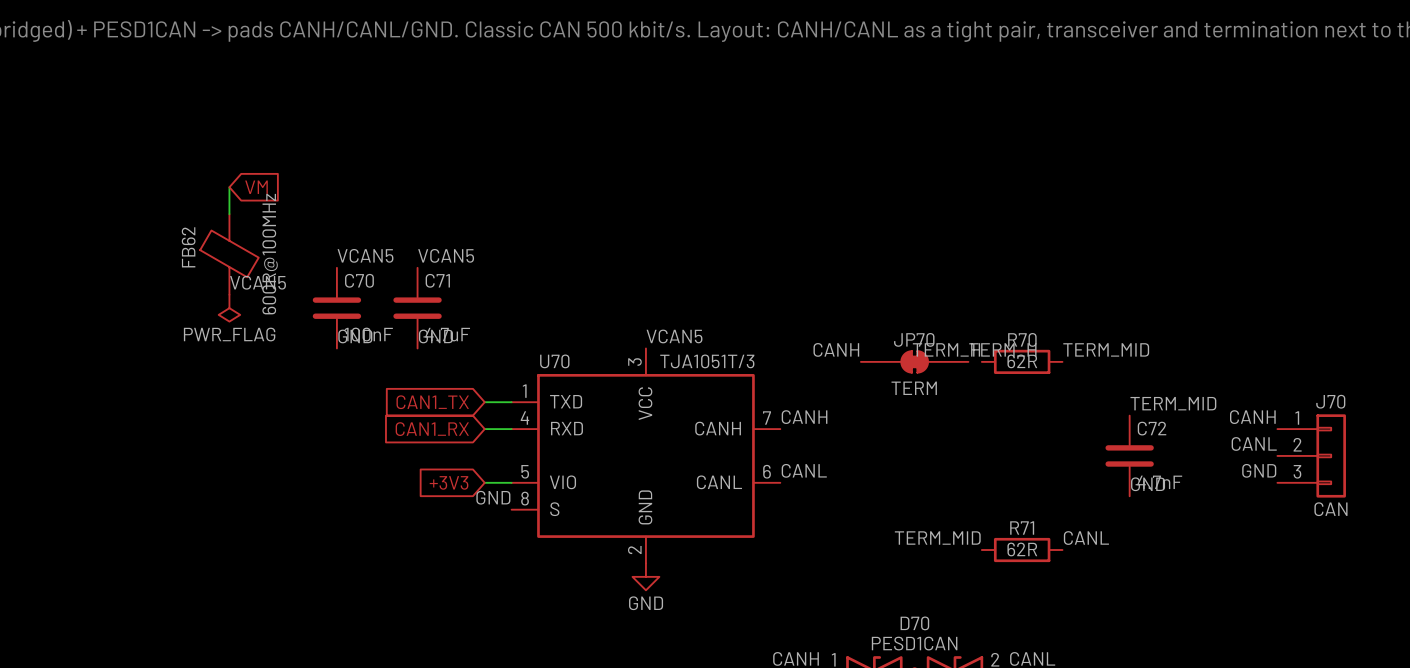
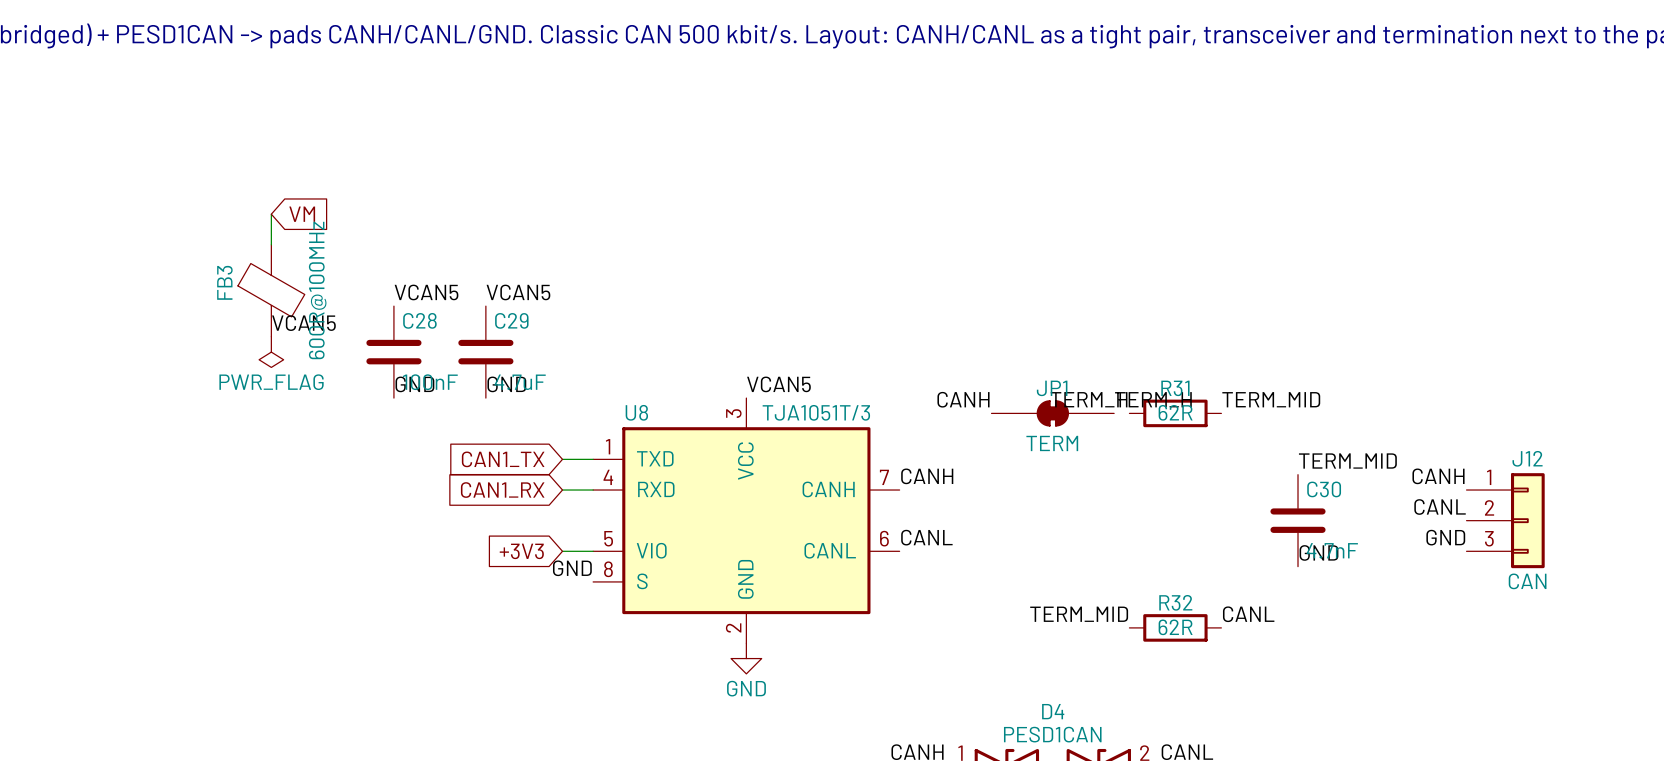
FB62 name: FB62 (188, 247) -> FB3 (224, 282)
C70 name: C70 (359, 280) -> C28 (419, 320)
C71 name: C71 (437, 280) -> C29 (511, 320)
JP70 name: JP70 (914, 339) -> JP1 (1052, 388)
R70 name: R70 (1022, 339) -> R31 (1175, 388)
U70 name: U70 (554, 361) -> U8 (636, 412)
J70 name: J70 (1330, 401) -> J12 (1527, 458)
C72 name: C72 (1152, 428) -> C30 (1324, 489)
R71 name: R71 (1022, 528) -> R32 (1175, 602)
D70 name: D70 (914, 623) -> D4 (1053, 711)

